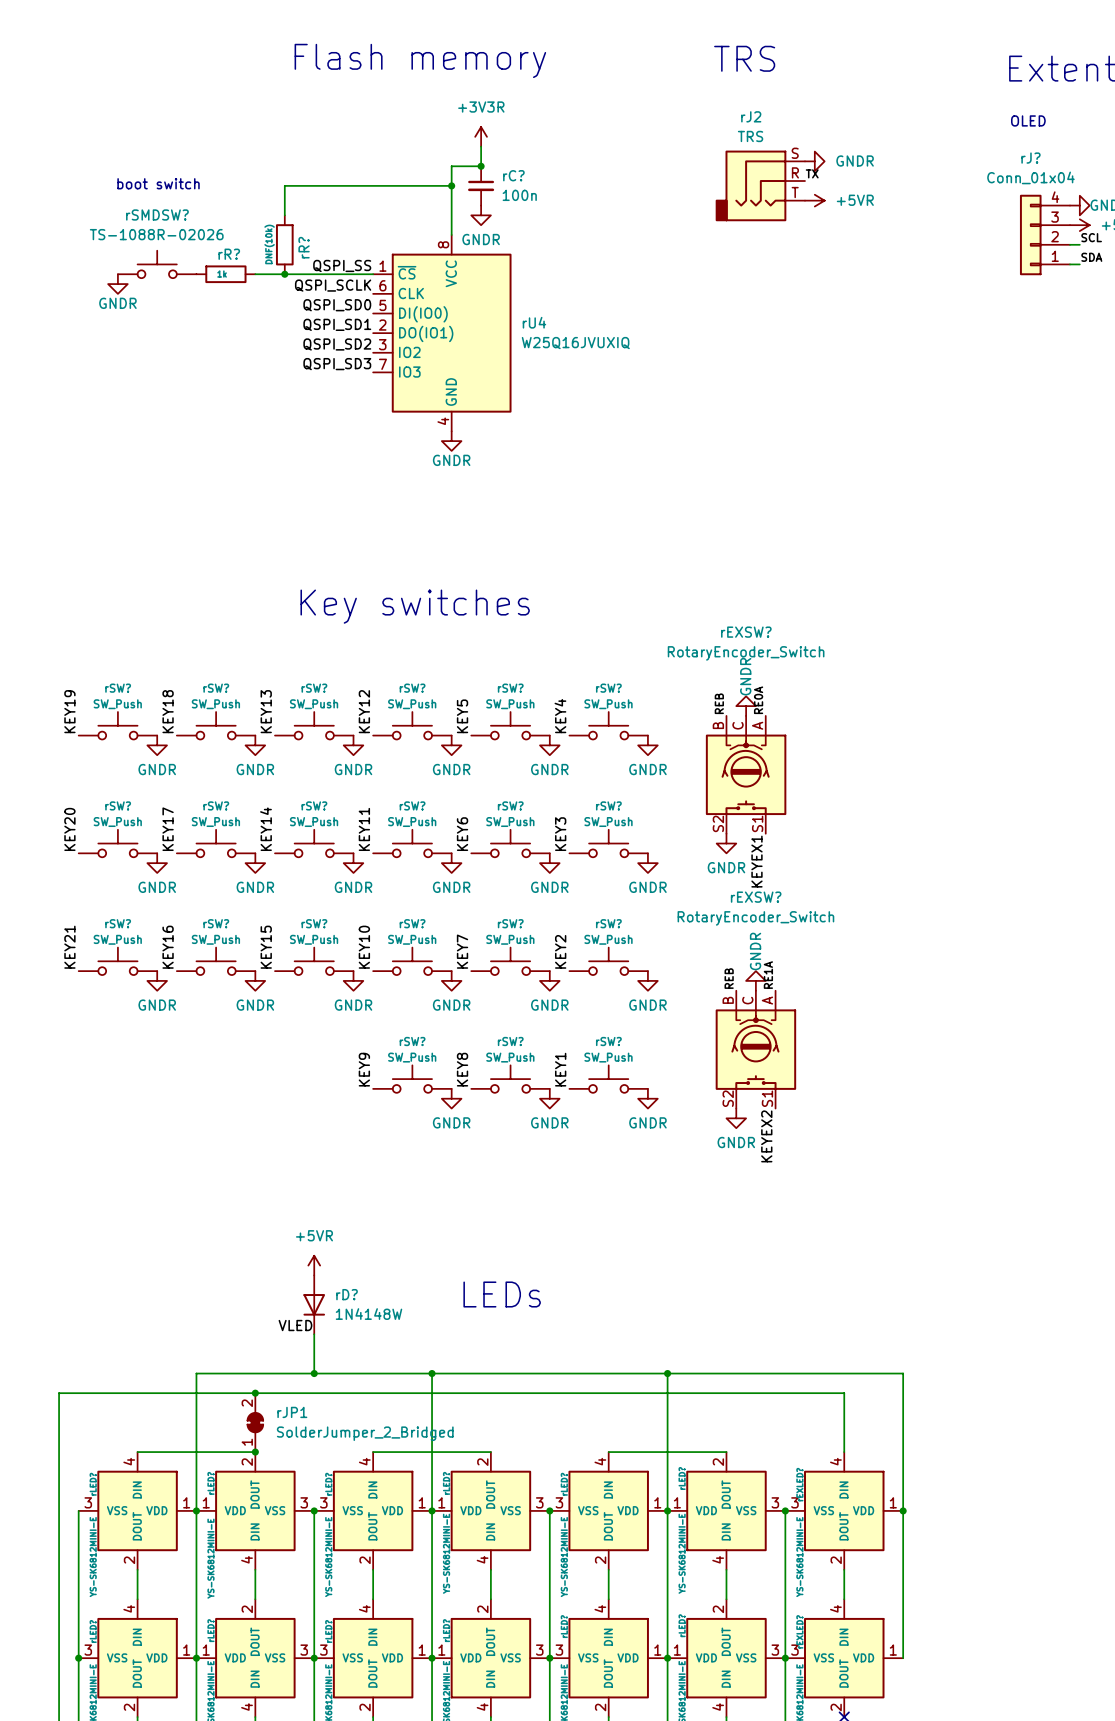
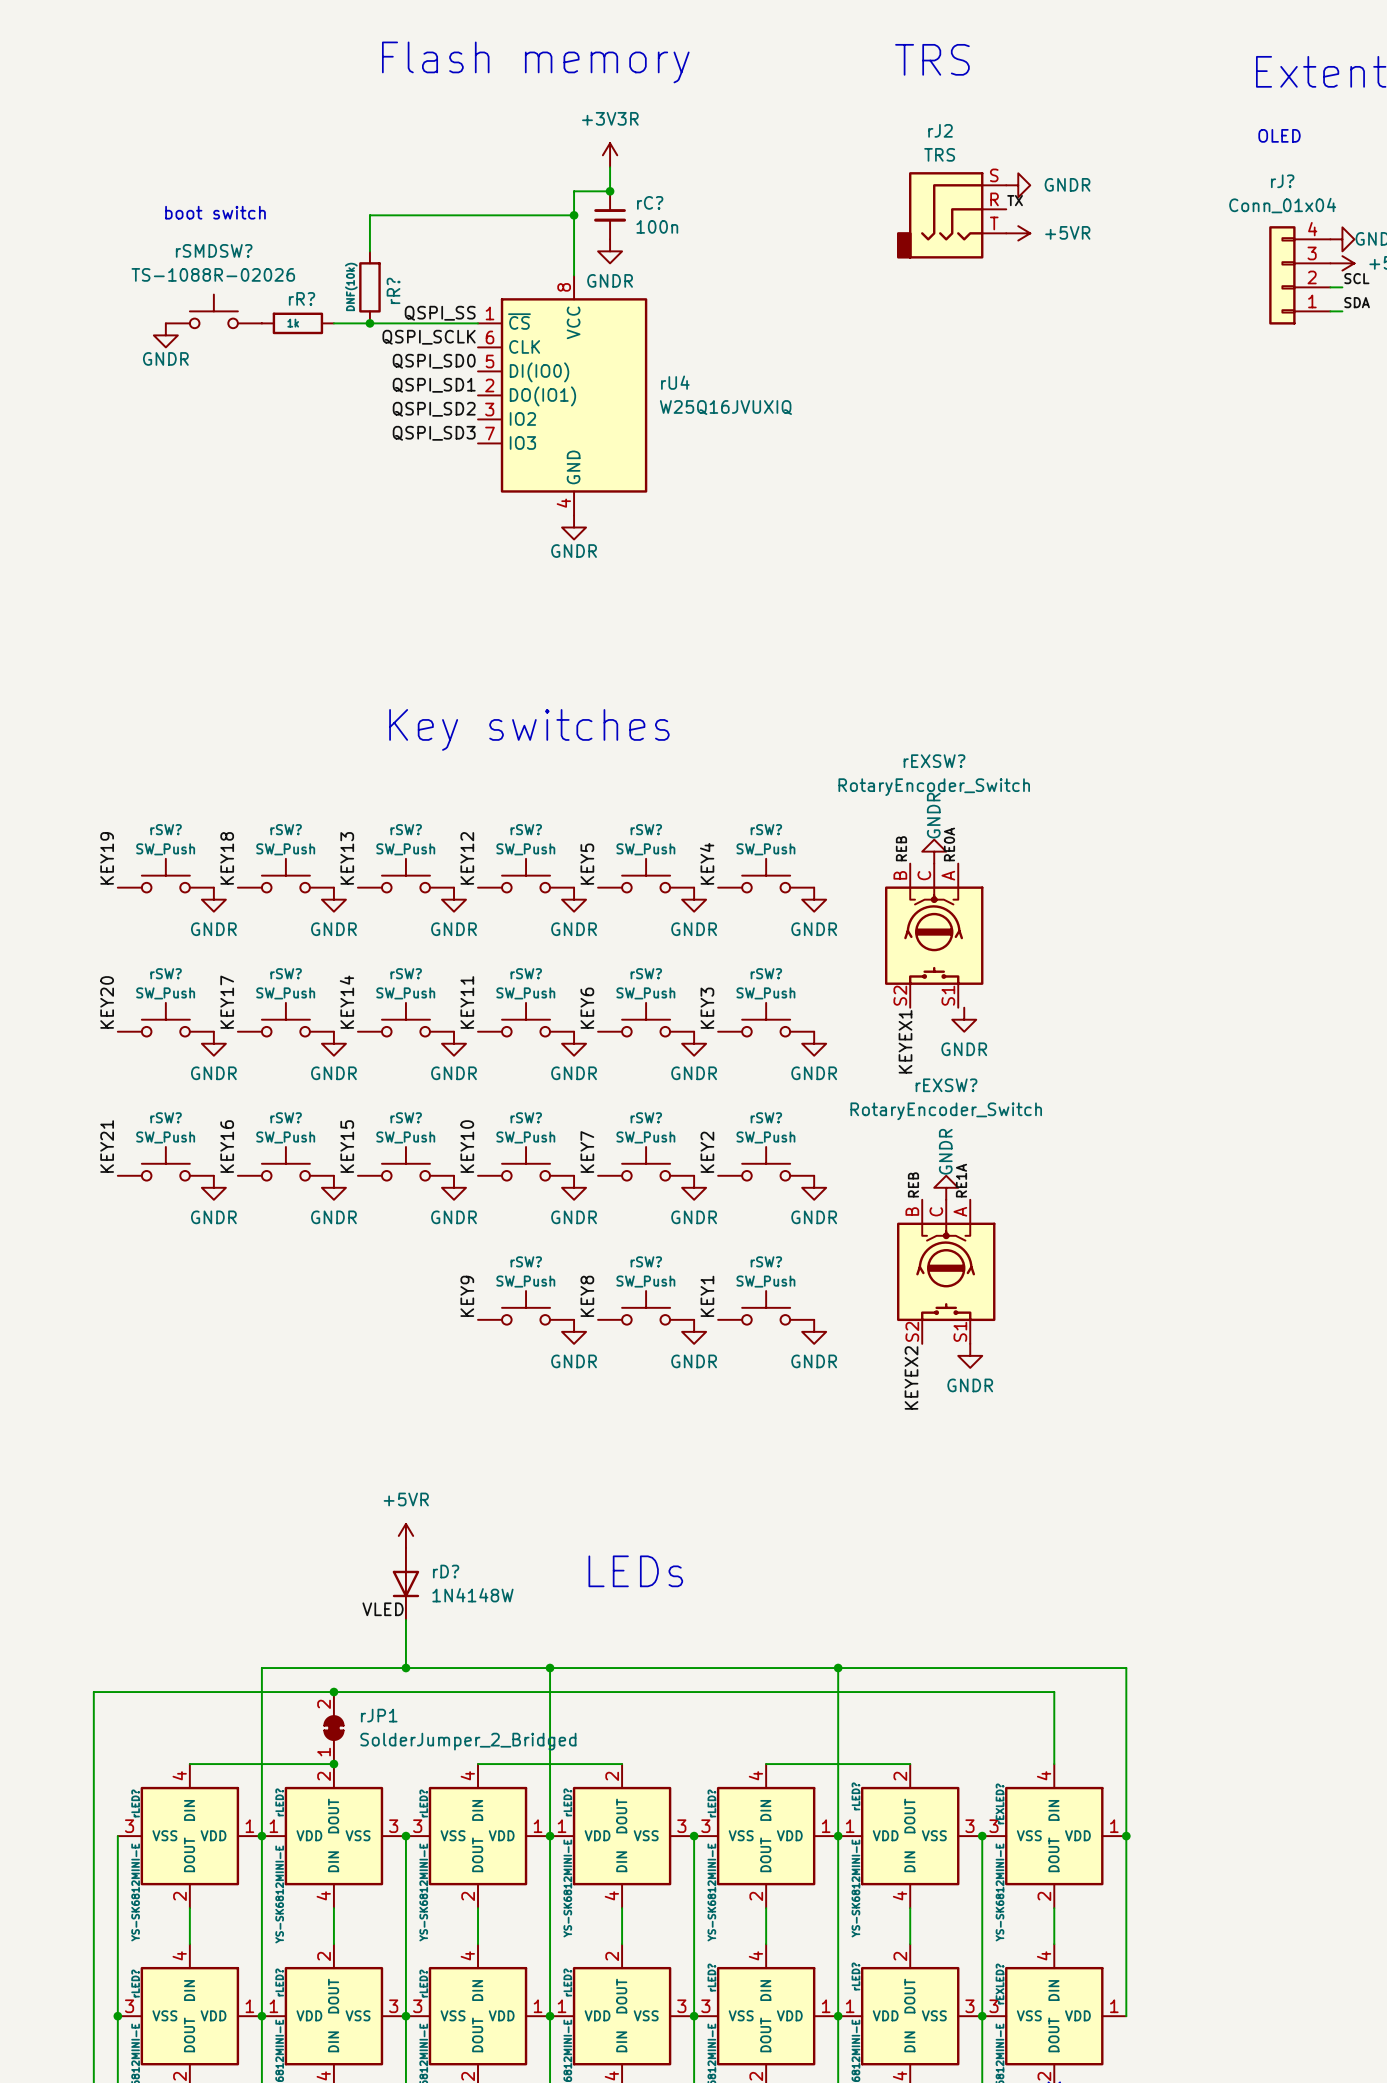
power symbol position: GNDR (726, 843) -> GNDR (964, 1019)
label position: KEYEX1 (756, 861) -> KEYEX1 (905, 1041)
power symbol position: GNDR (736, 1118) -> GNDR (970, 1355)
label position: KEYEX2 (766, 1136) -> KEYEX2 (911, 1377)

